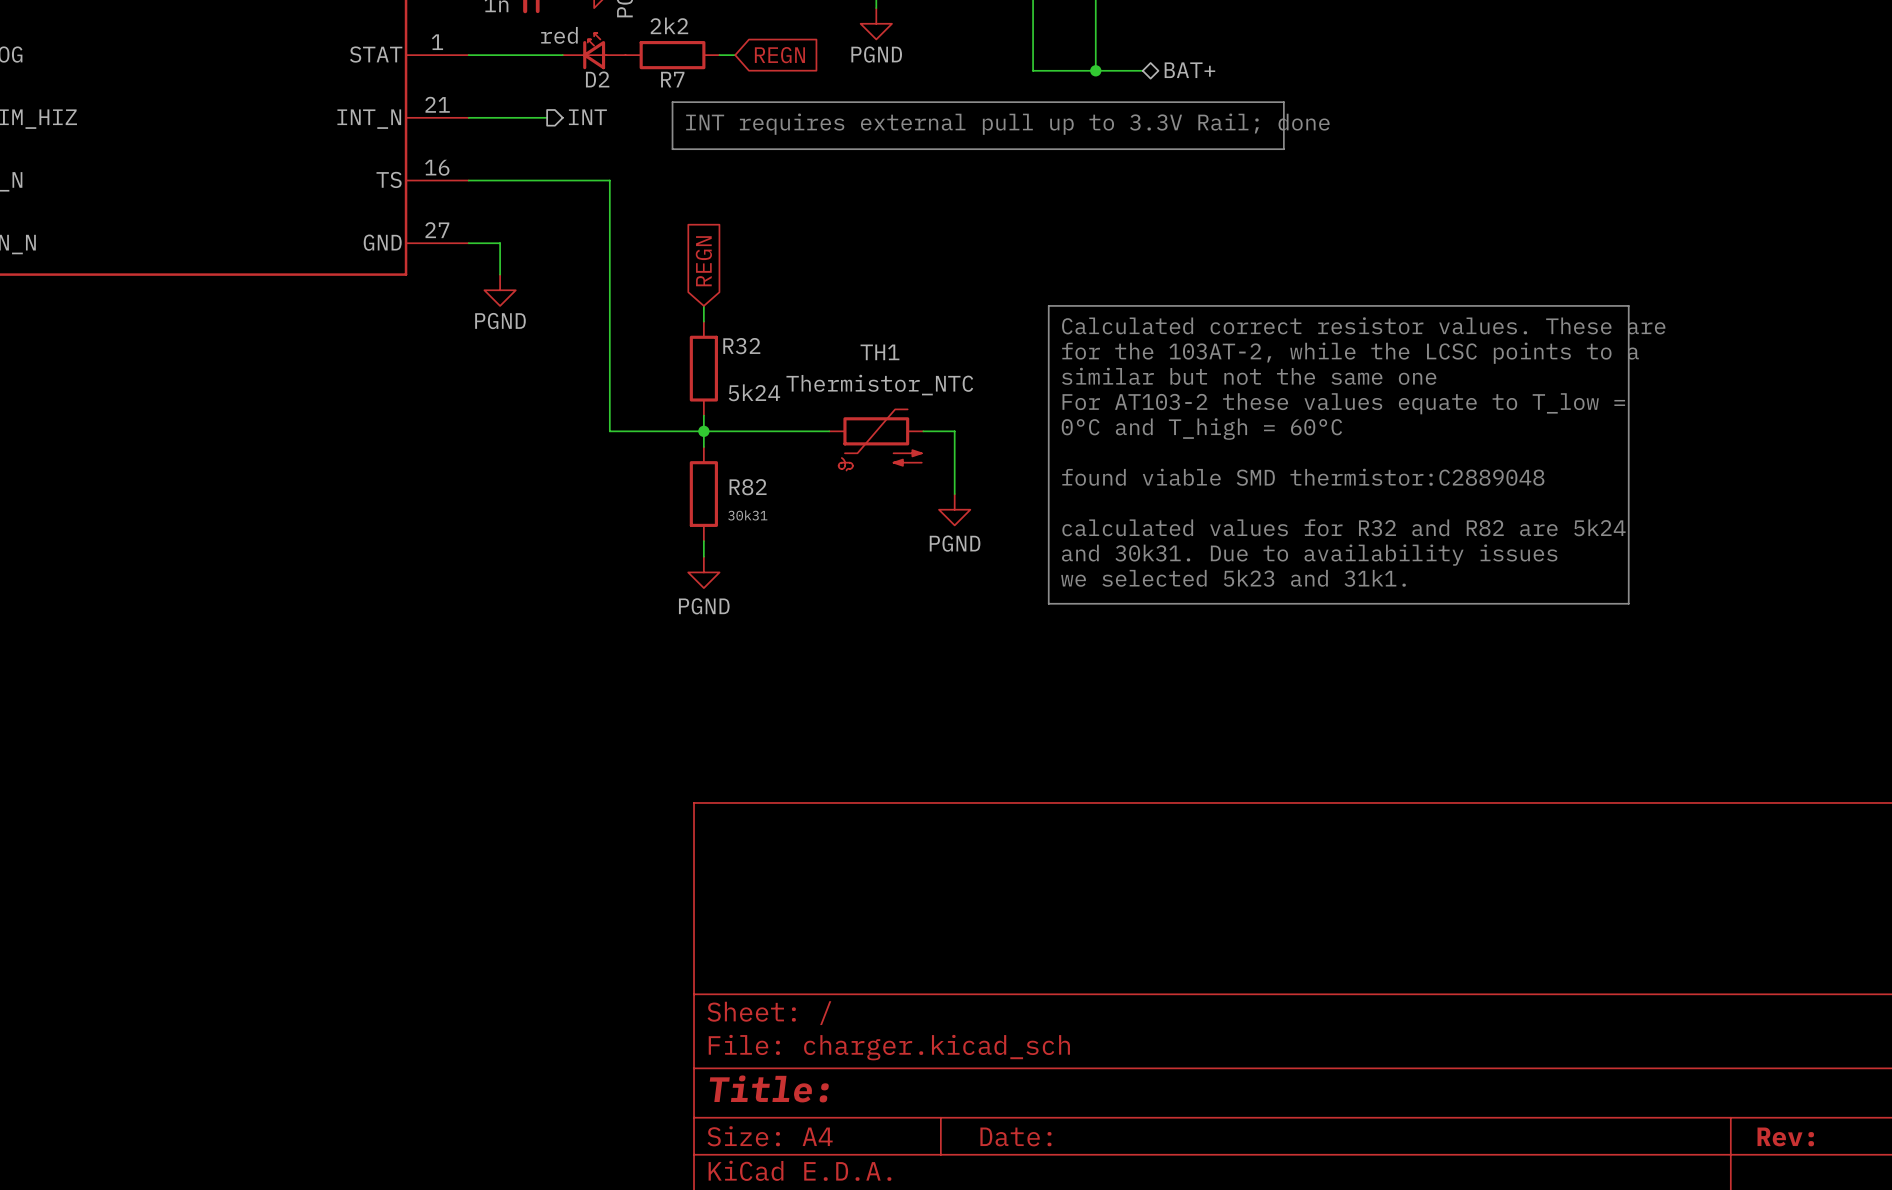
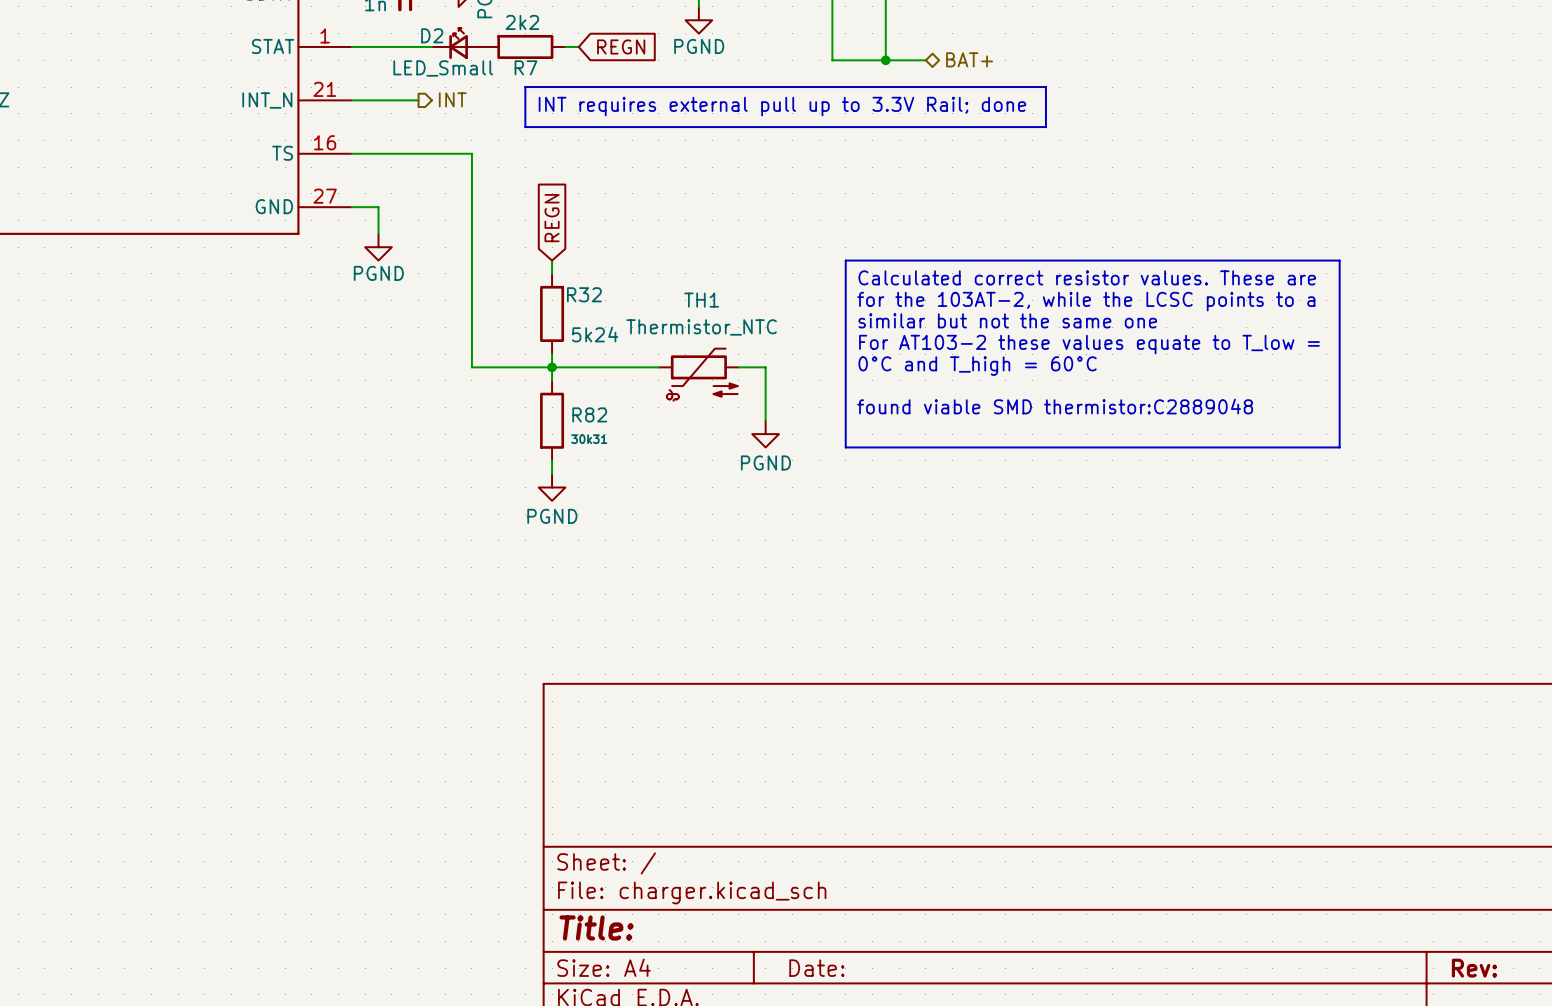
D2 value: red (559, 35) -> LED_Small (443, 68)
D2 name position: D2 (597, 79) -> D2 (432, 35)
line: (1048, 525) (1048, 603) (1628, 603) (1628, 525) -> (845, 447) (1339, 447)
text: calculated values for R32 and R82 are 5k24 (1343, 527) -> none
text: and 30k31. Due to availability issues (1309, 555) -> none
text: we selected 5k23 and 31k1. (1233, 578) -> none

